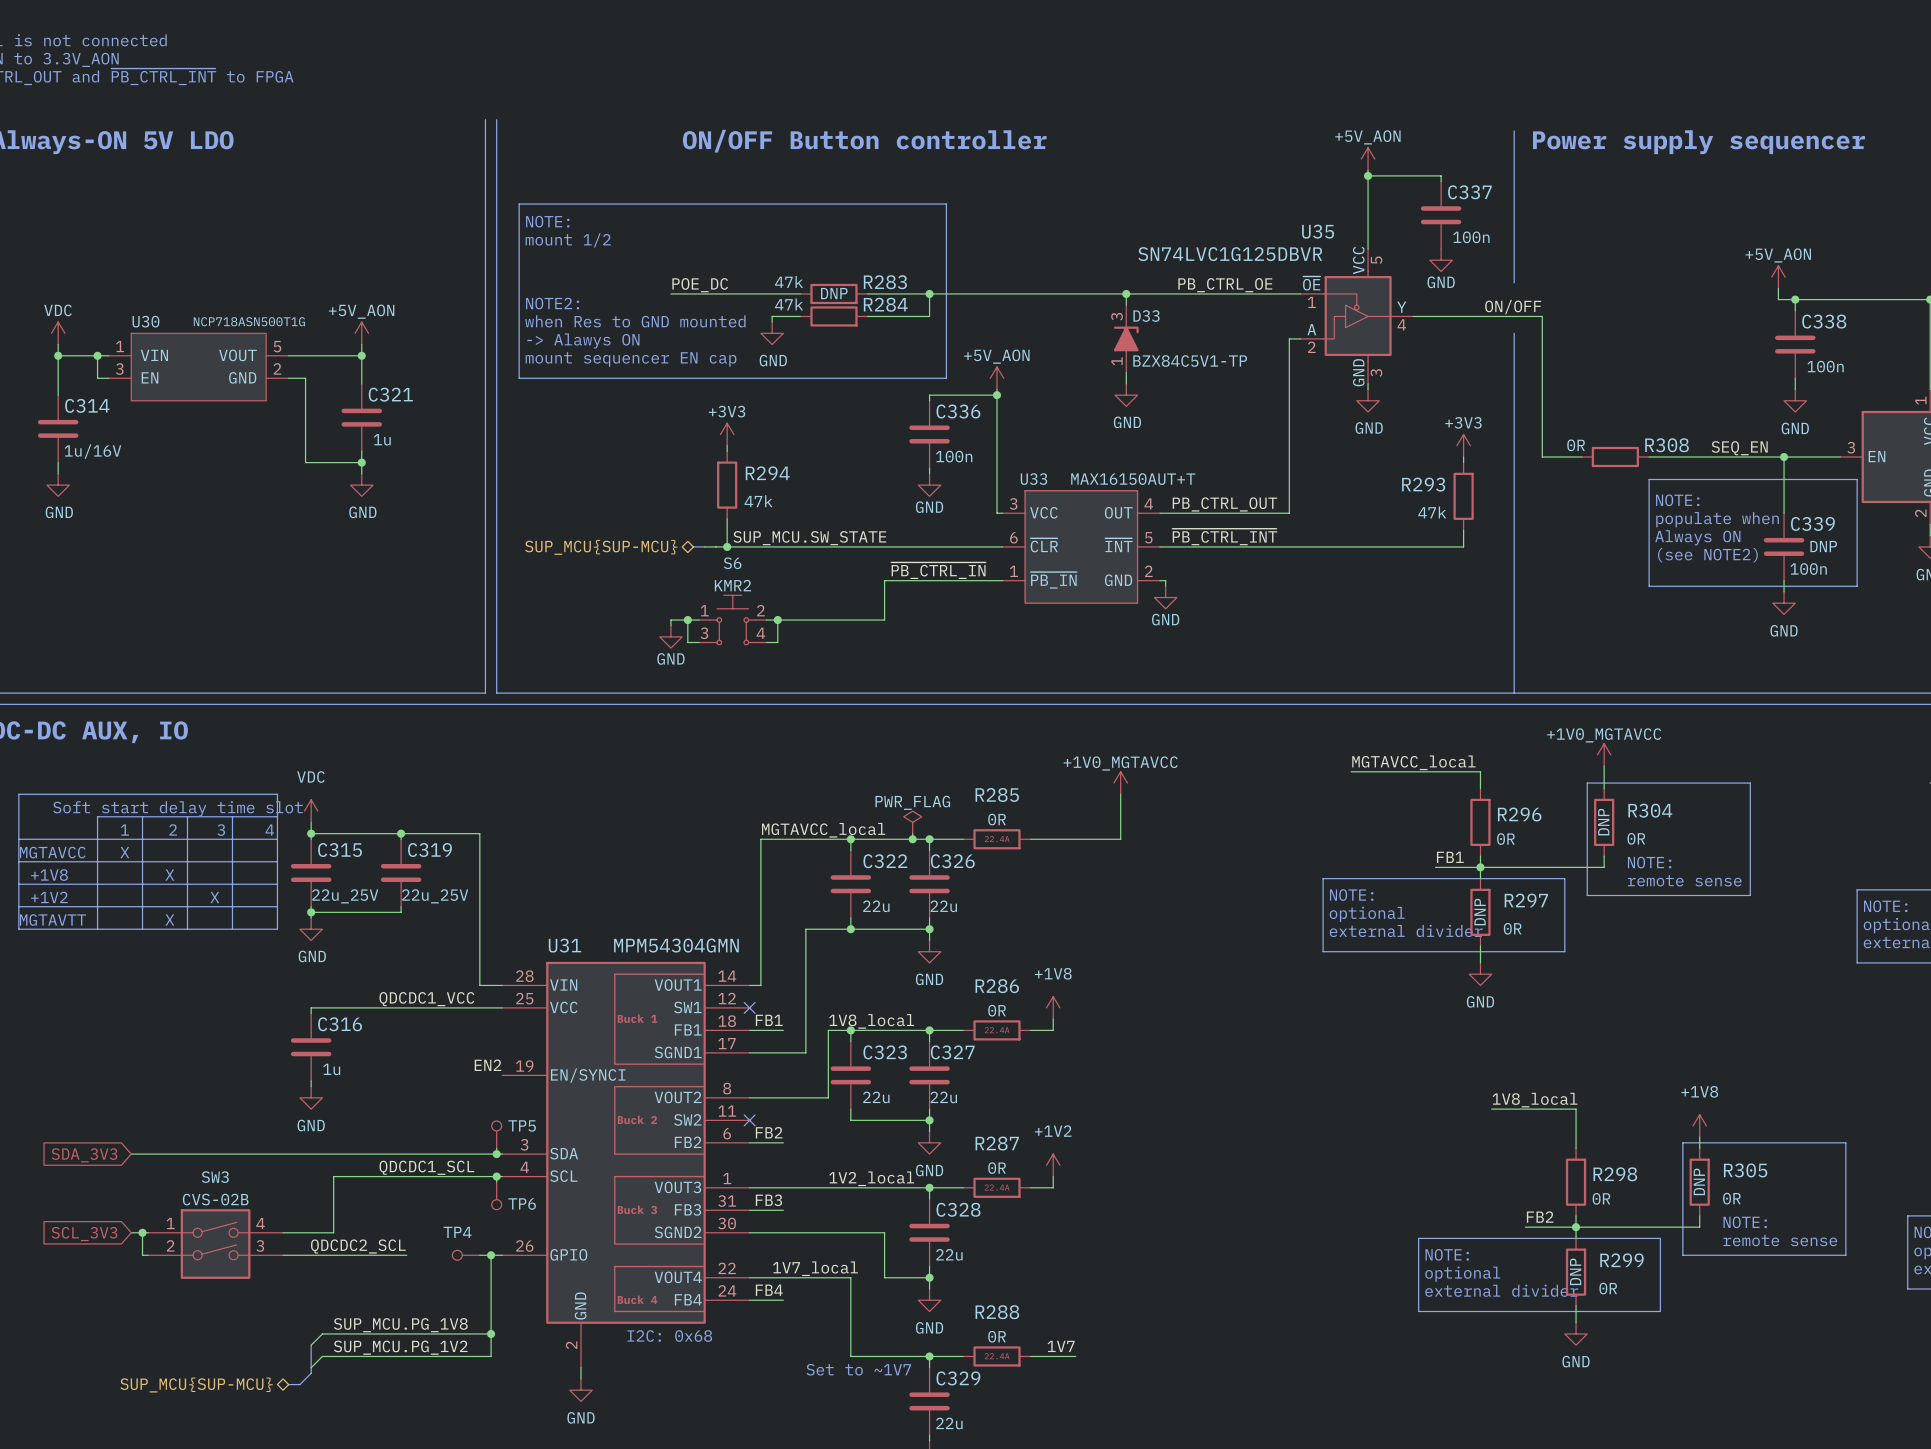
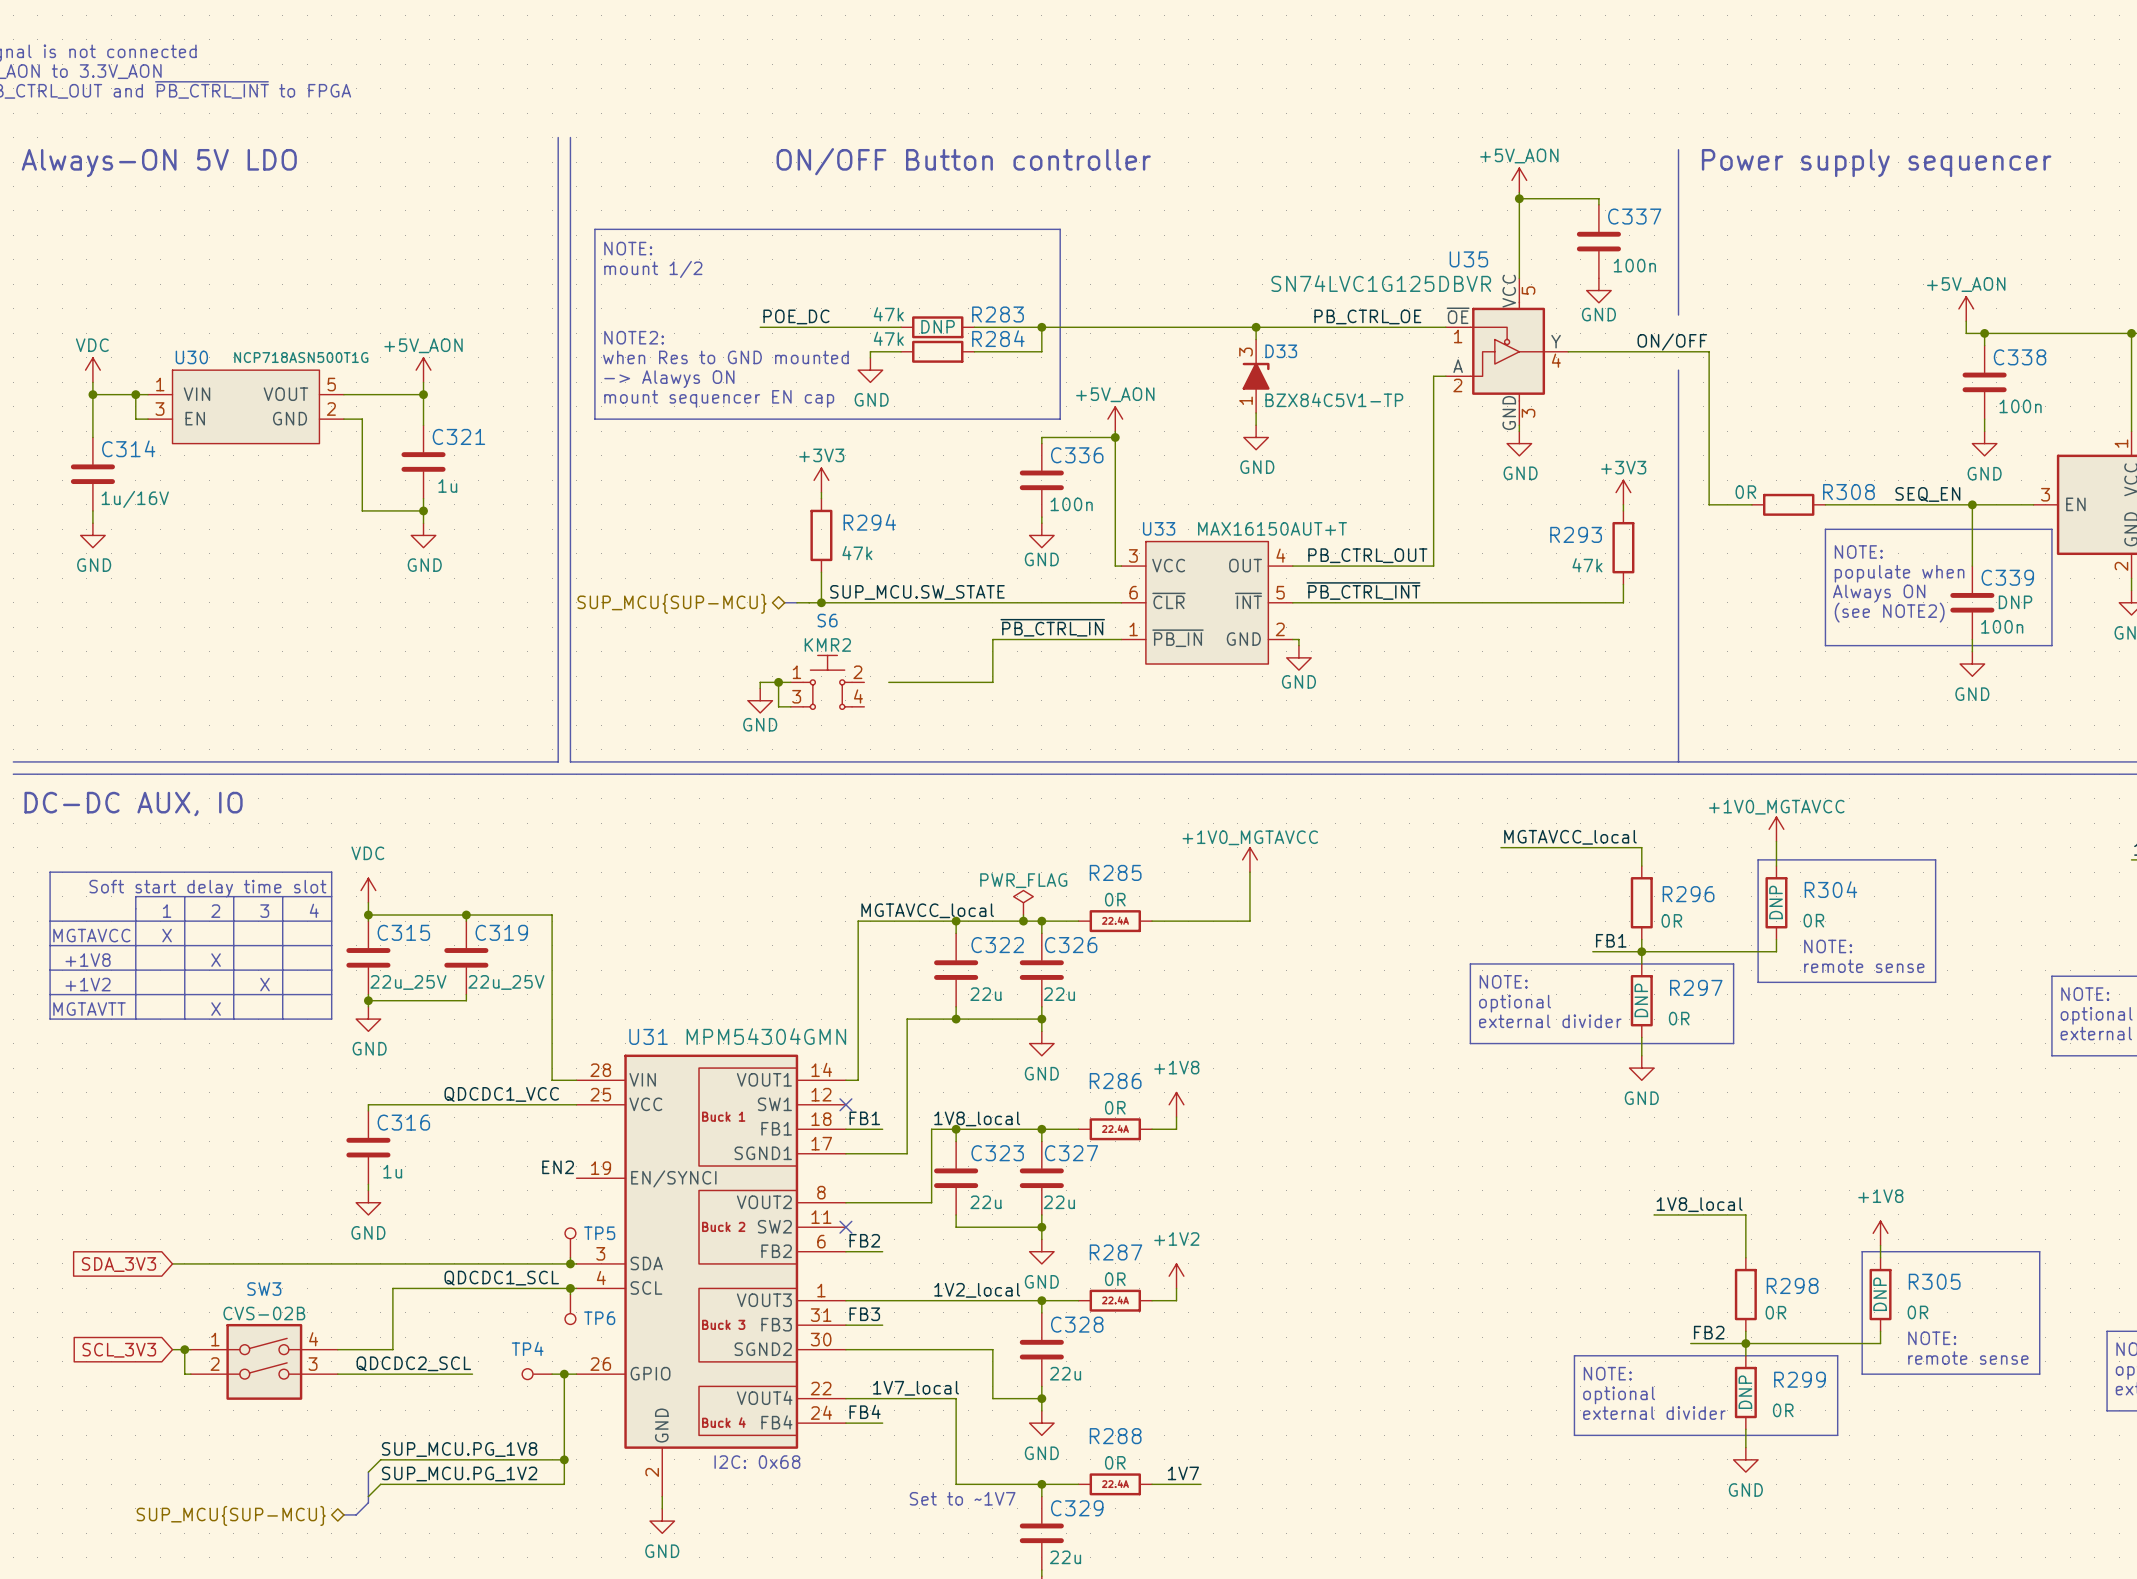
wire: (766, 620) (789, 620) -> none
wire: (777, 620) (777, 642) (766, 642) -> none
junction: (777, 620) -> none

